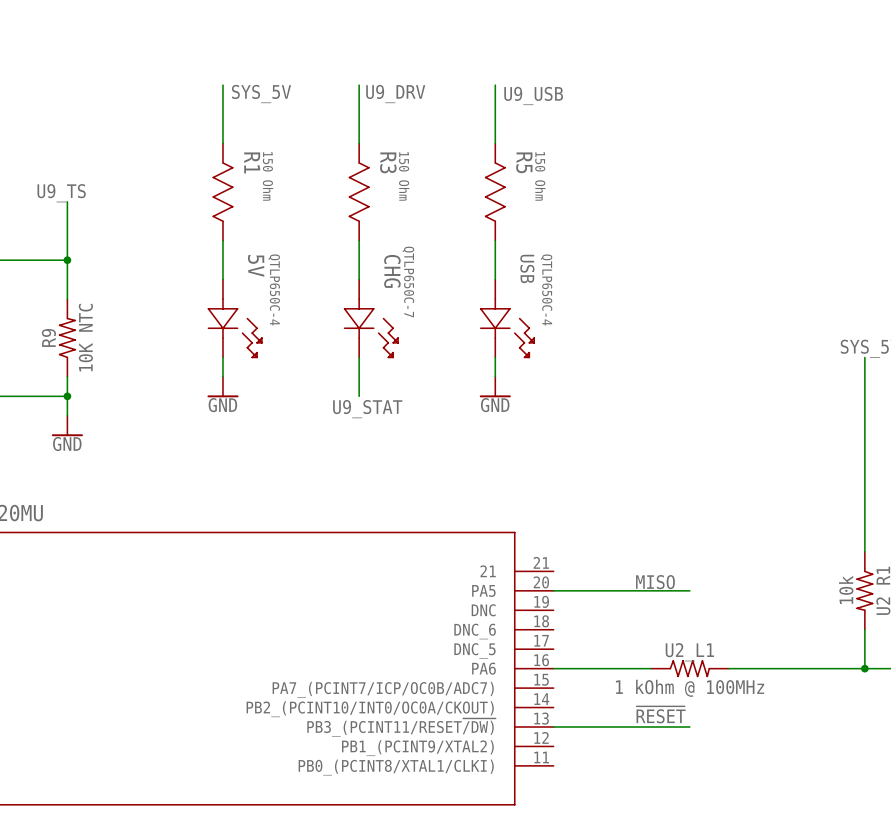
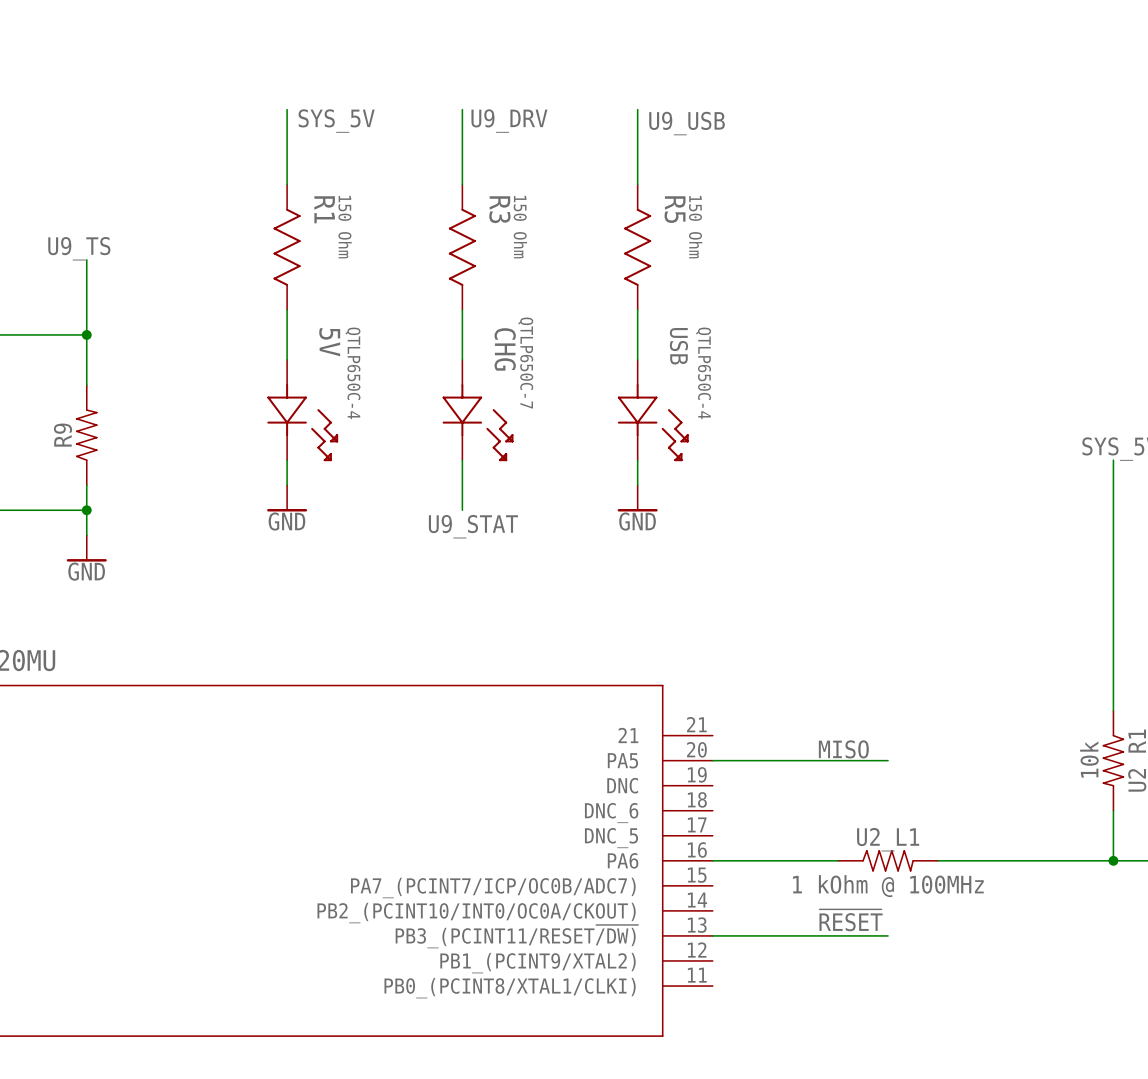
R9 value: 10K NTC (85, 337) -> none

